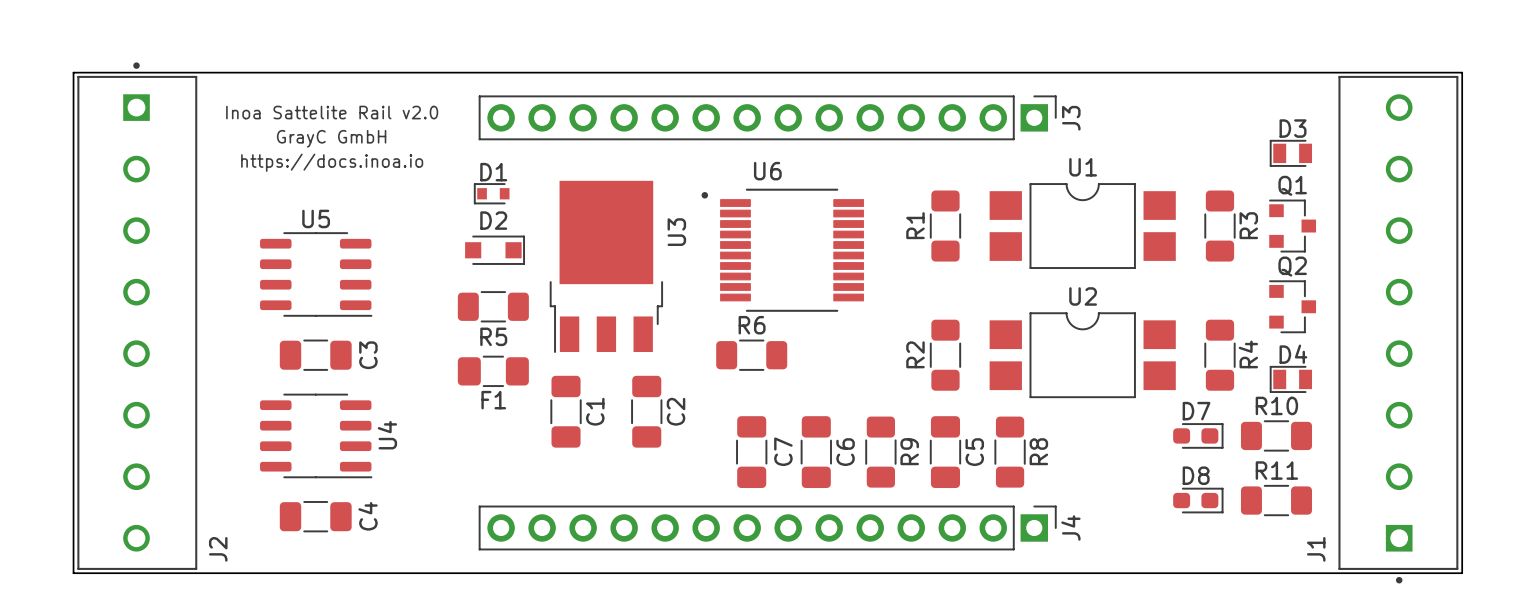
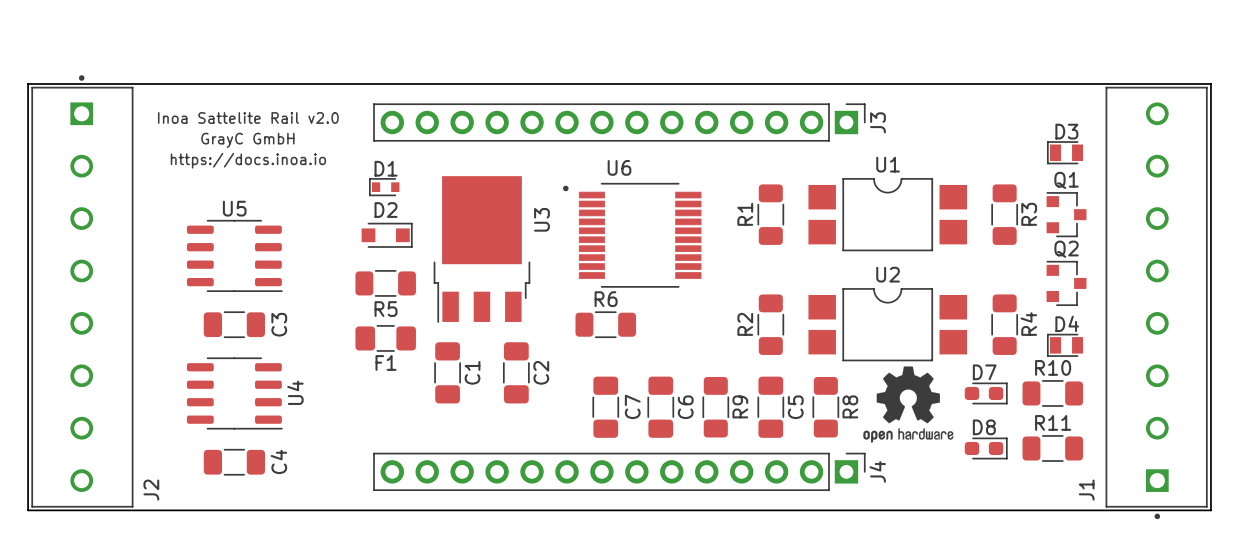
drawing: none -> [863, 366, 954, 443]

